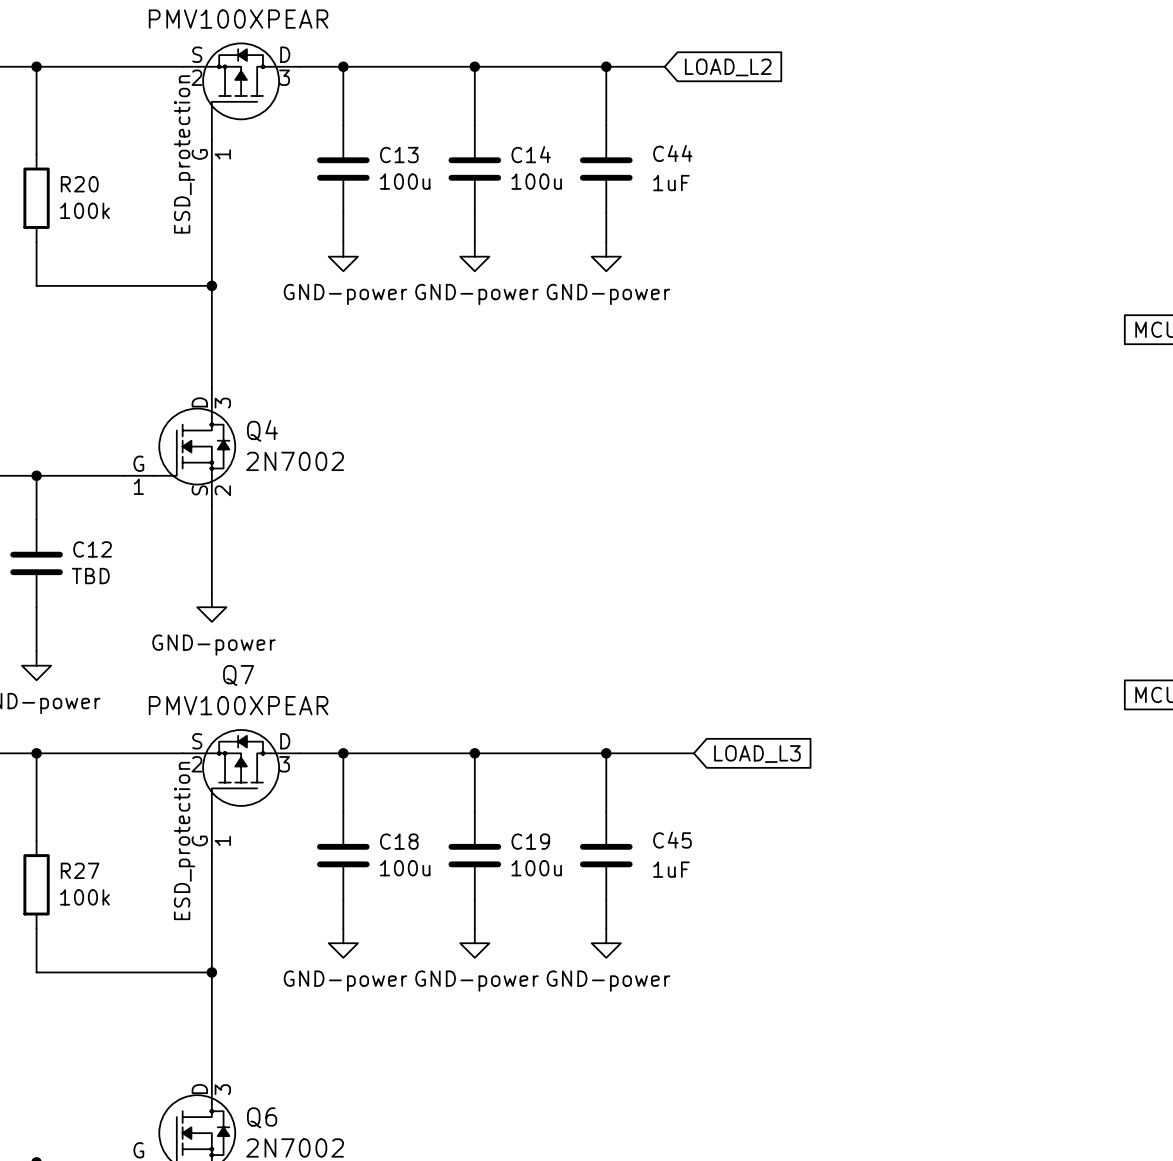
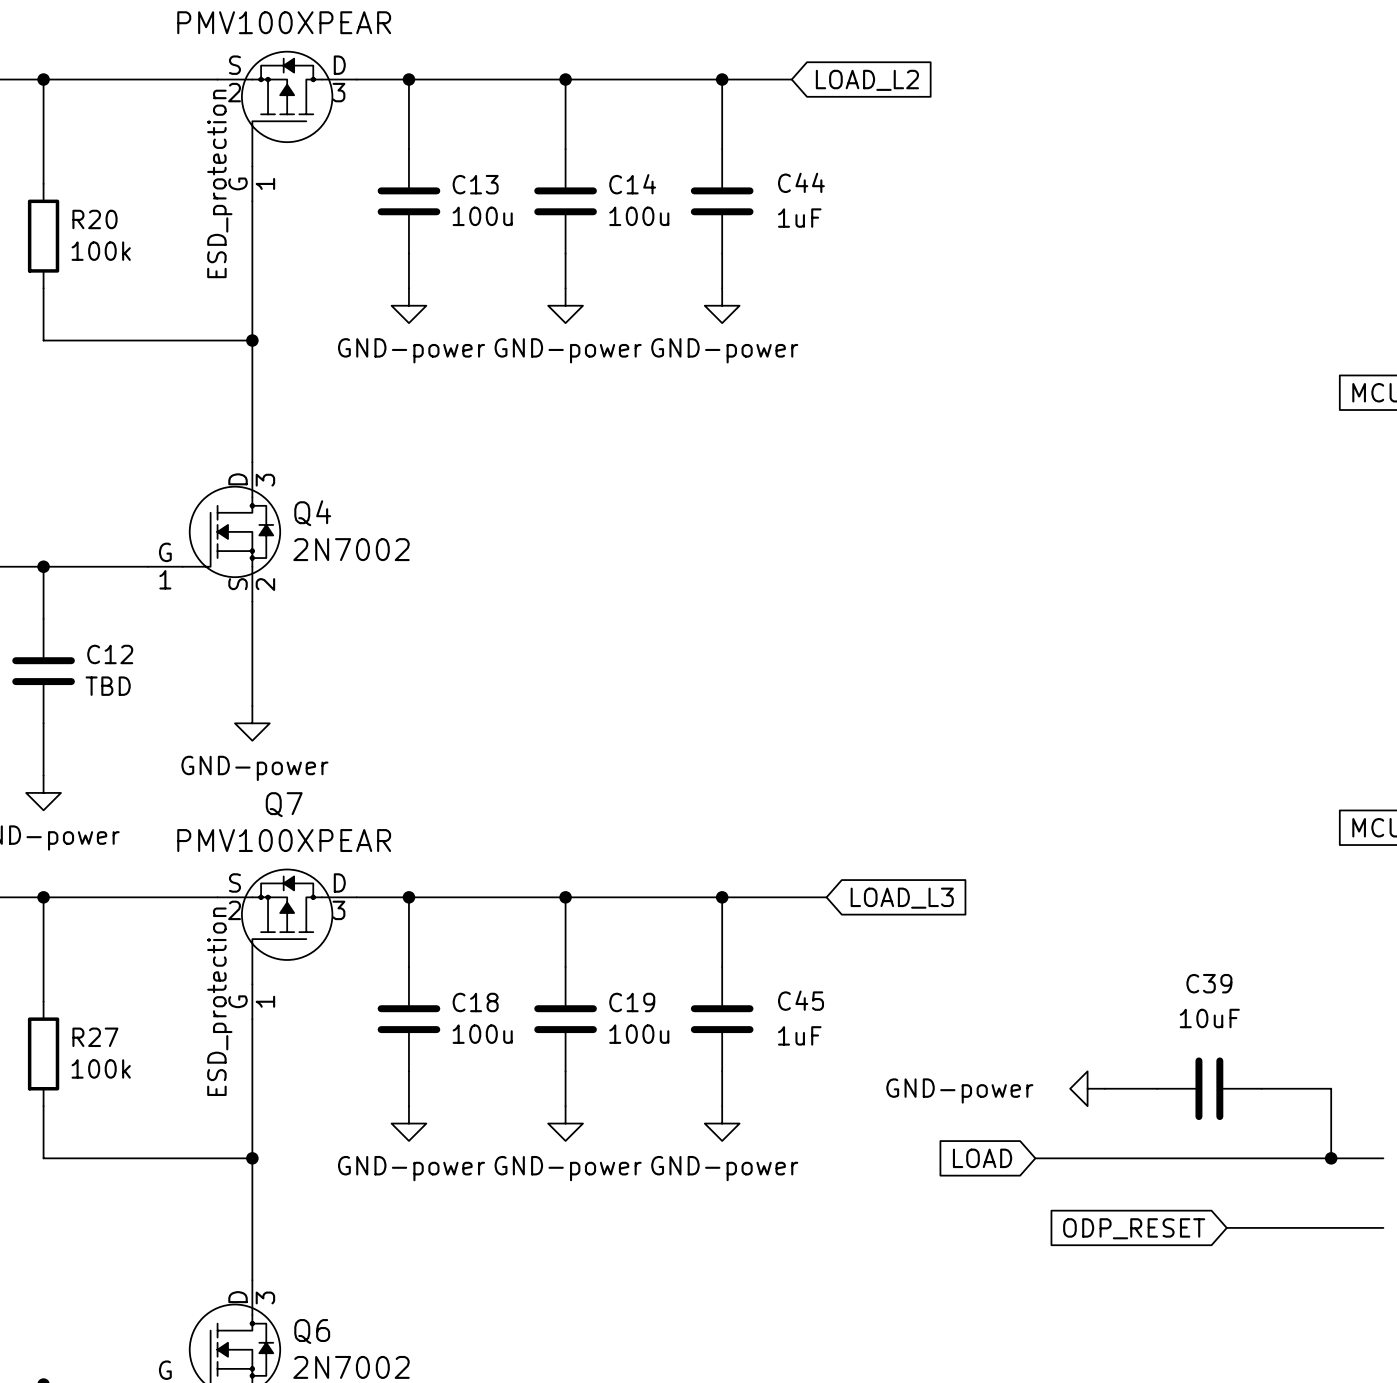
power symbol: none -> GND-power (1087, 1088)
wire: none -> (1104, 1088) (1157, 1088)
C39: none -> 10uF (1209, 1088)
wire: none -> (1261, 1088) (1331, 1088) (1331, 1158)
global label: none -> LOAD (982, 1158)
wire: none -> (1035, 1158) (1383, 1158)
junction: none -> (1331, 1158)
wire: none -> (1226, 1227) (1383, 1227)
global label: none -> ODP_RESET (1134, 1228)

